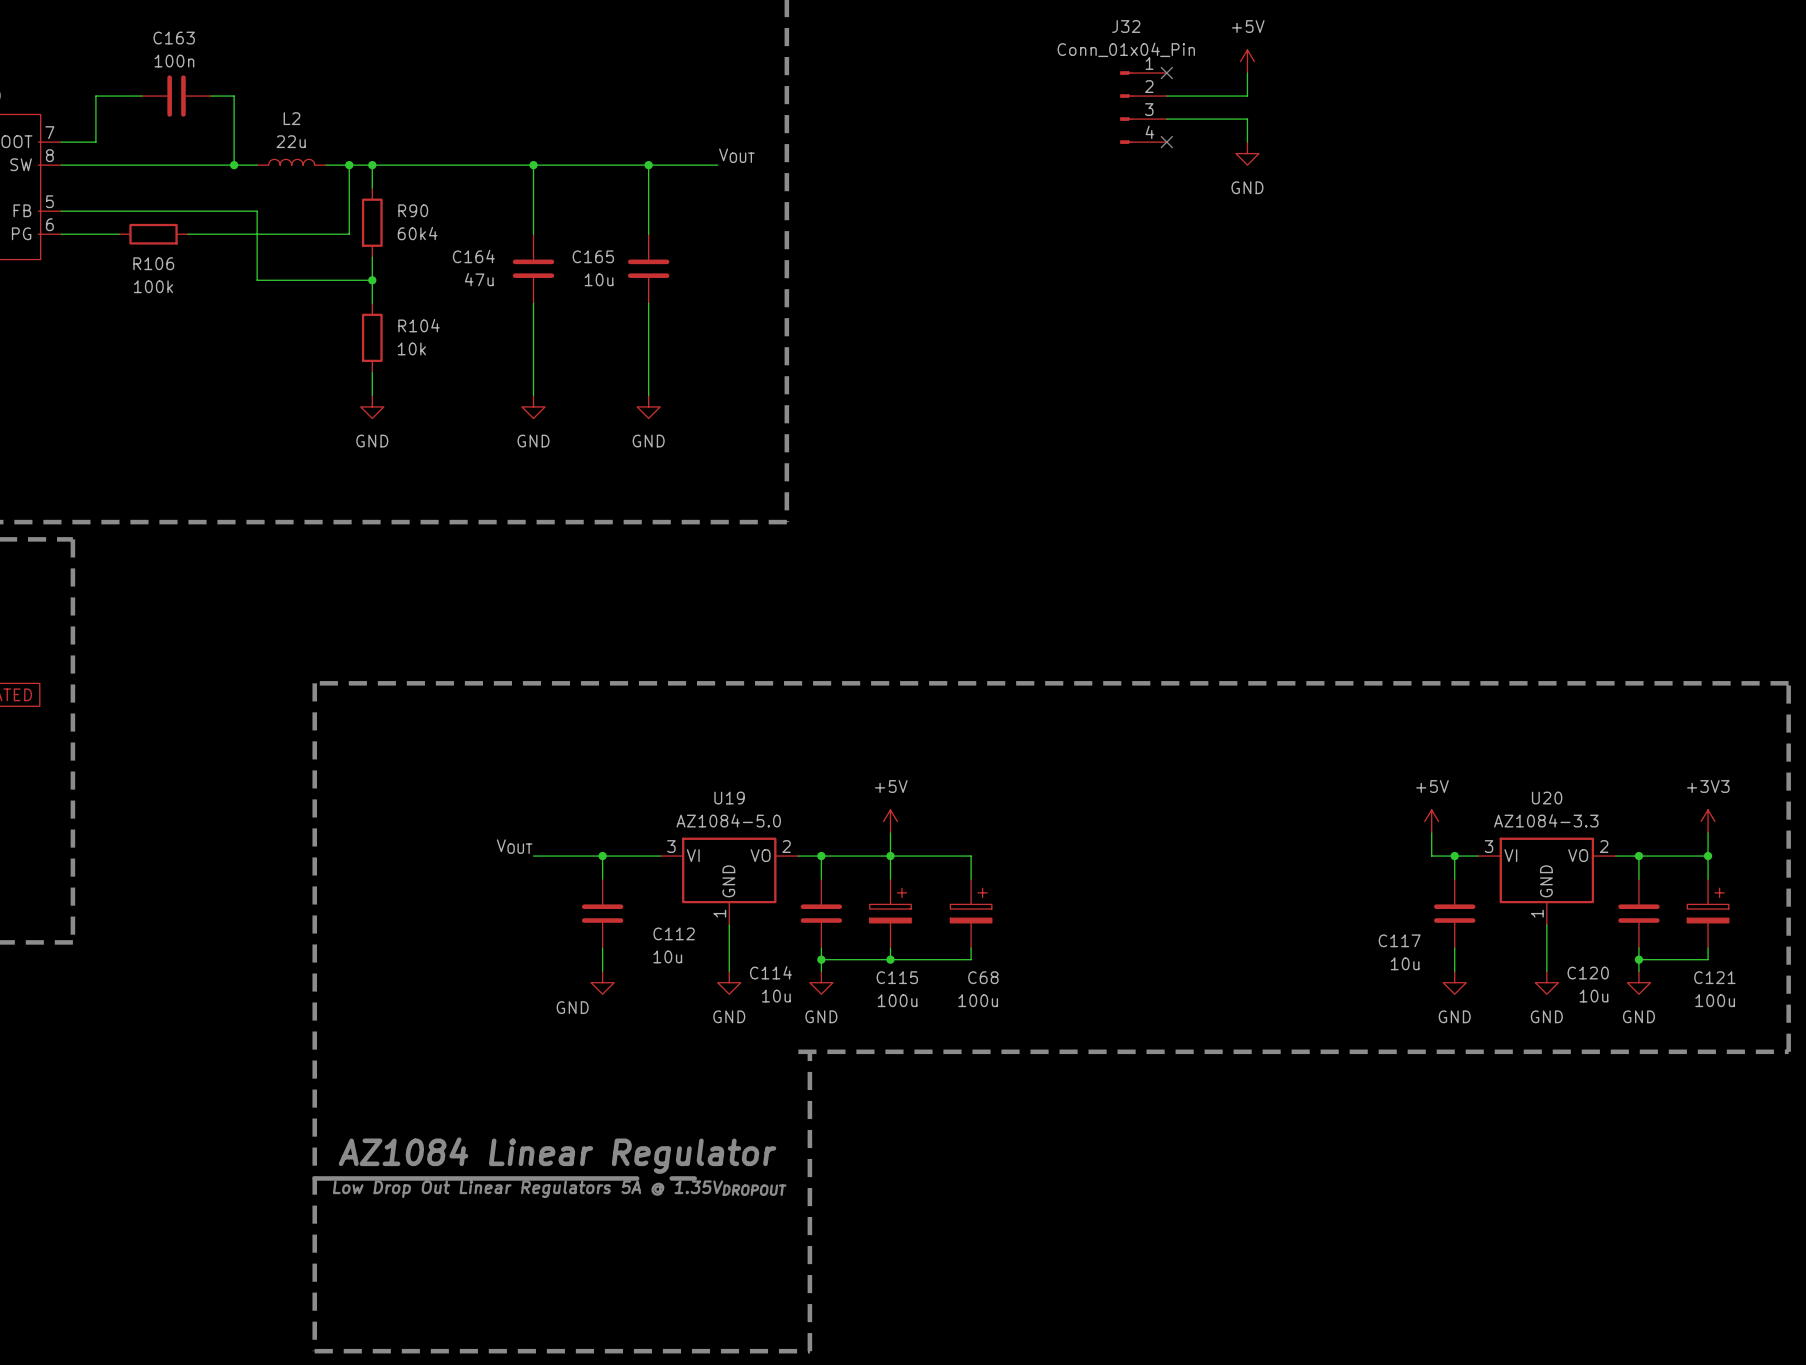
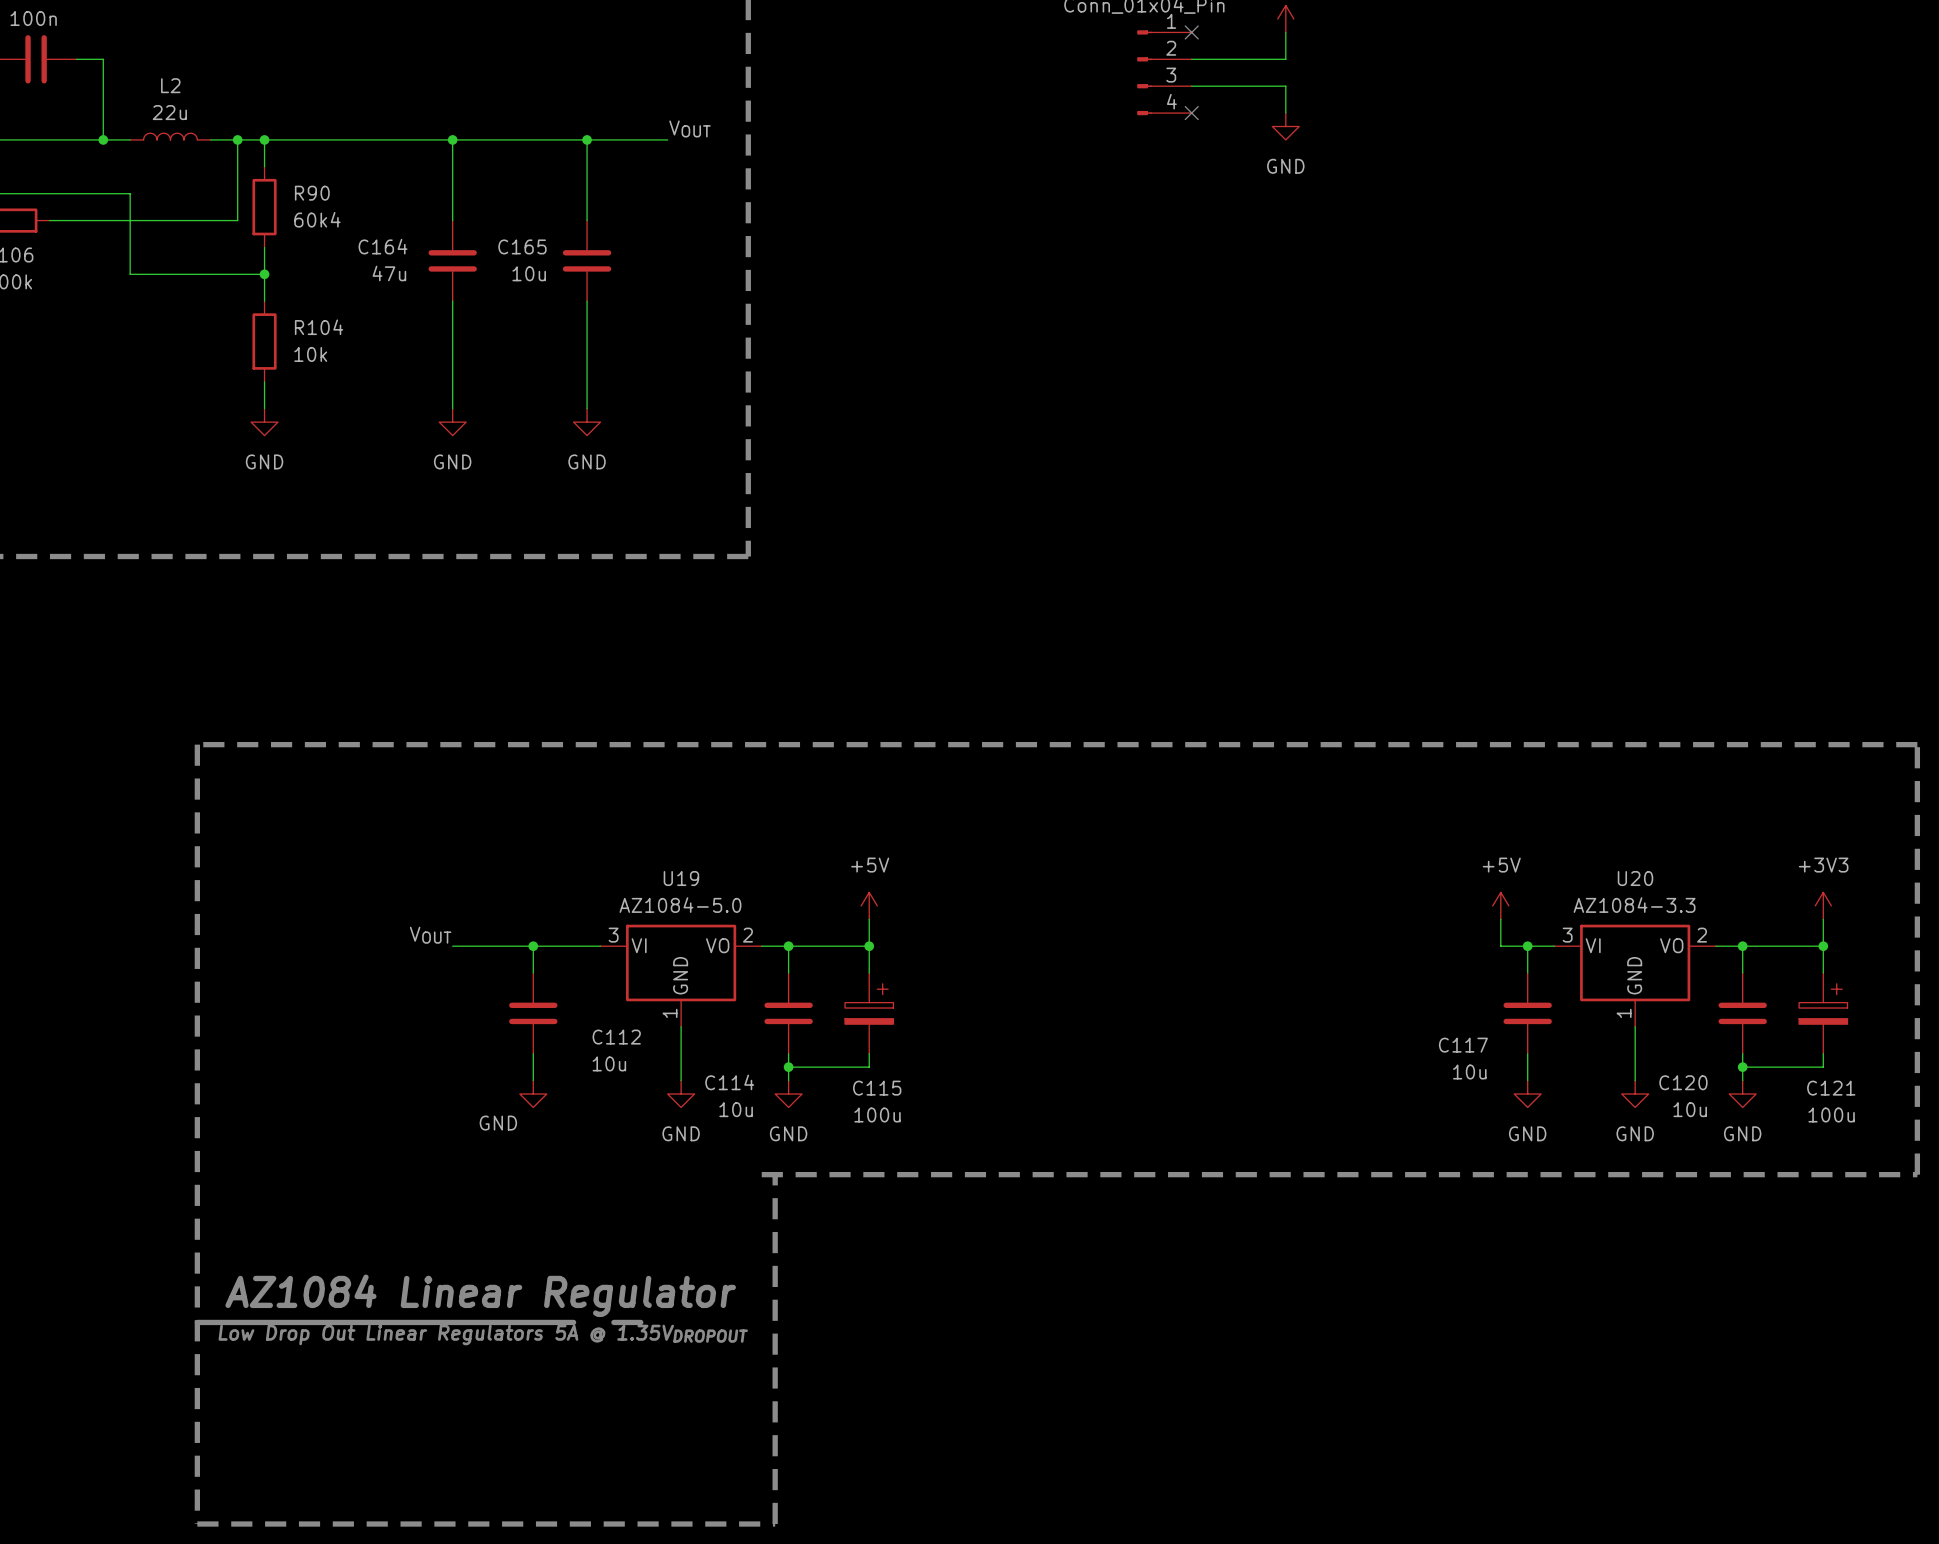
wire: (890, 856) (971, 856) (971, 879) -> none
C68: 100u (971, 913) -> none
wire: (971, 948) (971, 959) (890, 959) -> none
junction: (890, 959) -> none

